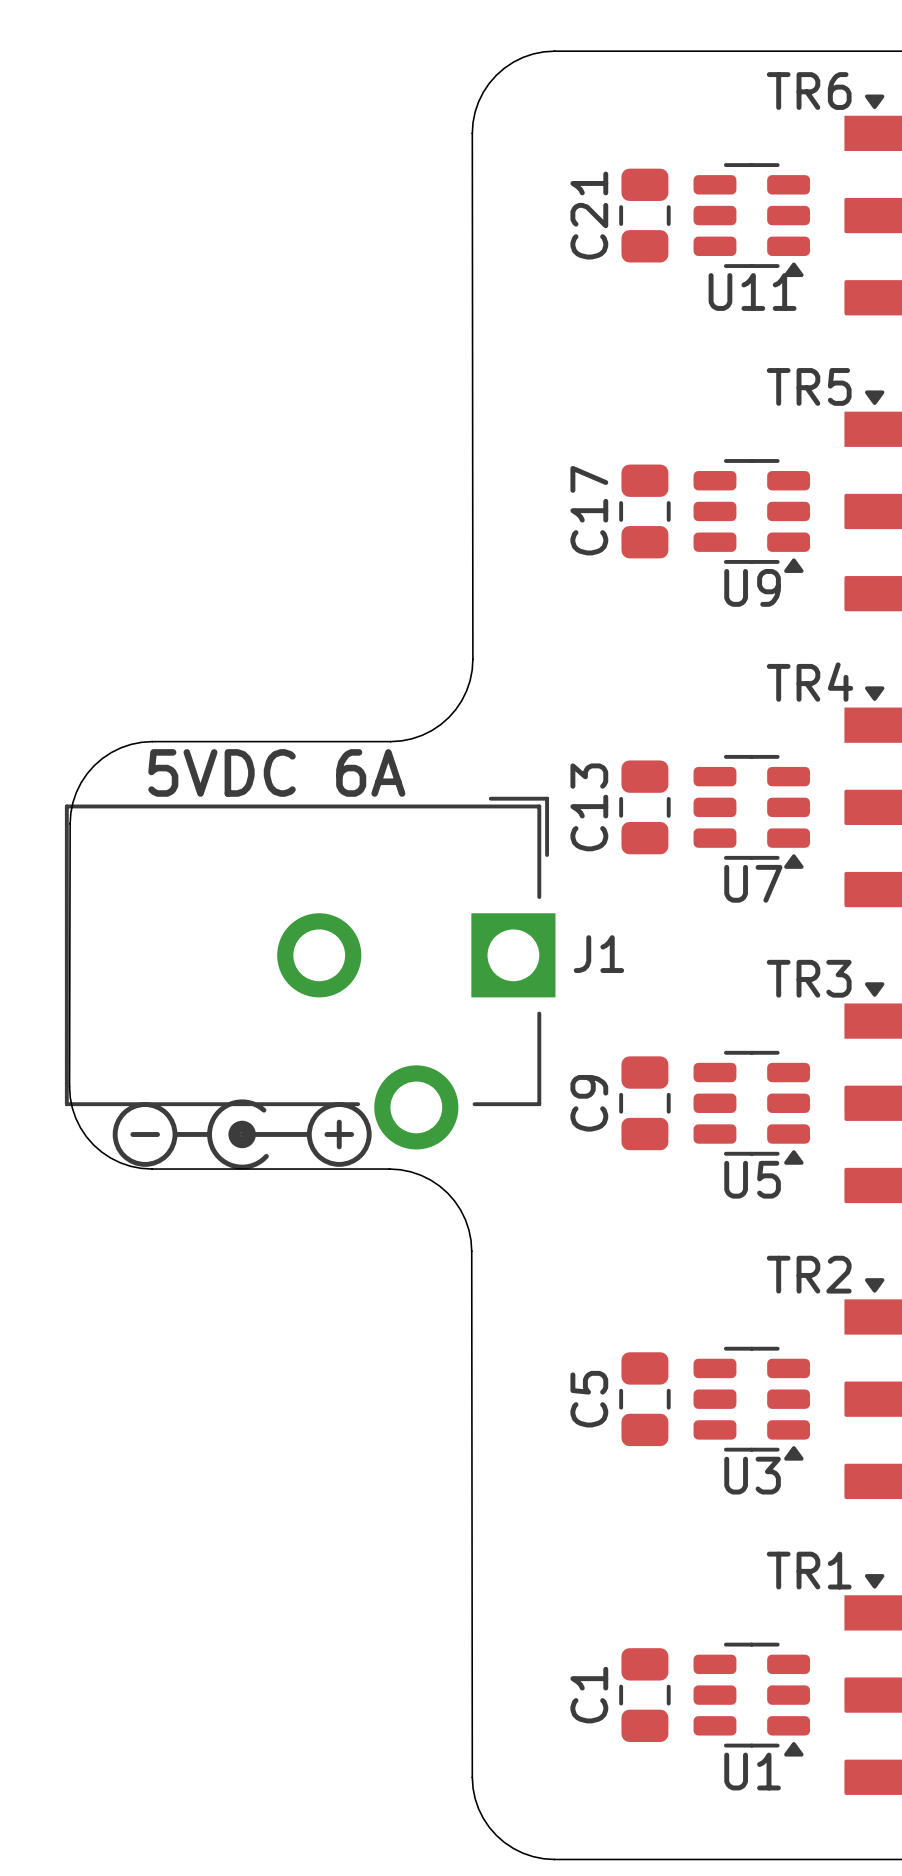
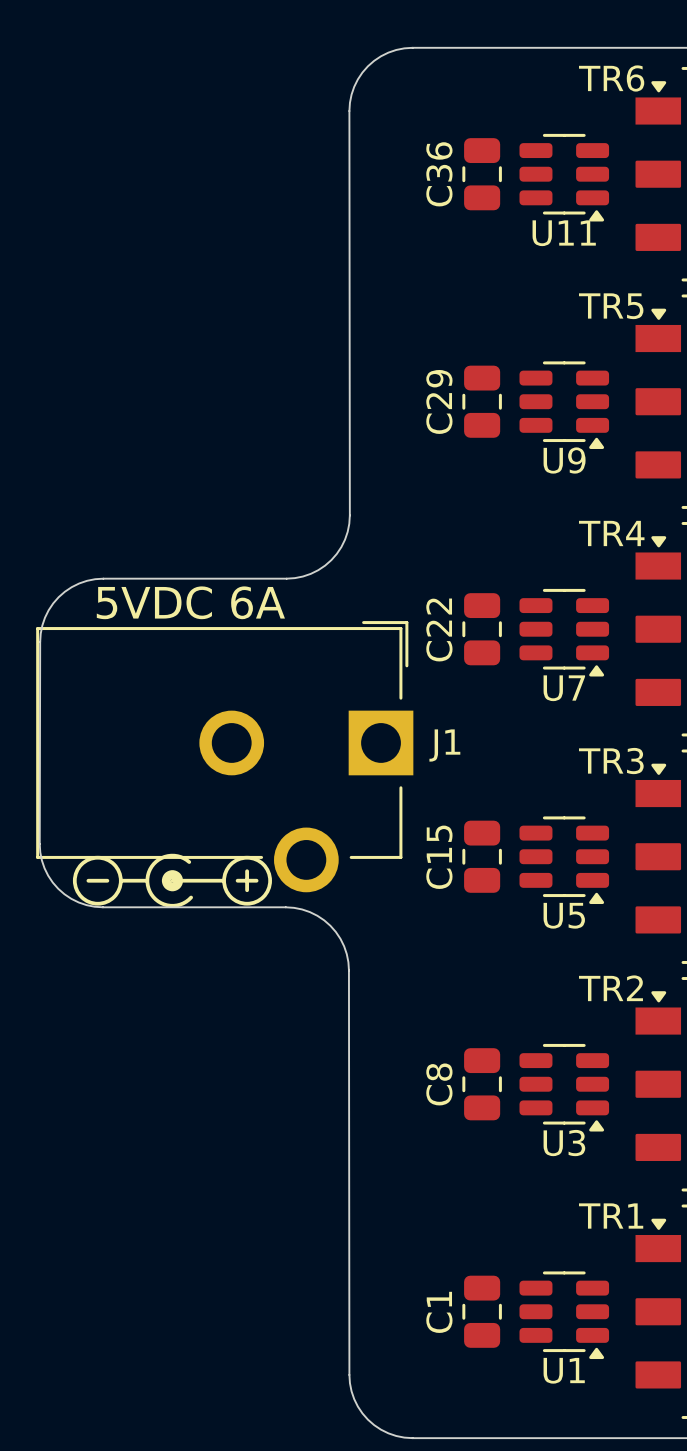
C21 name: C21 (589, 215) -> C36 (439, 174)
C17 name: C17 (589, 510) -> C29 (439, 401)
C13 name: C13 (589, 807) -> C22 (439, 629)
C9 name: C9 (589, 1103) -> C15 (439, 857)
C5 name: C5 (589, 1399) -> C8 (439, 1084)

